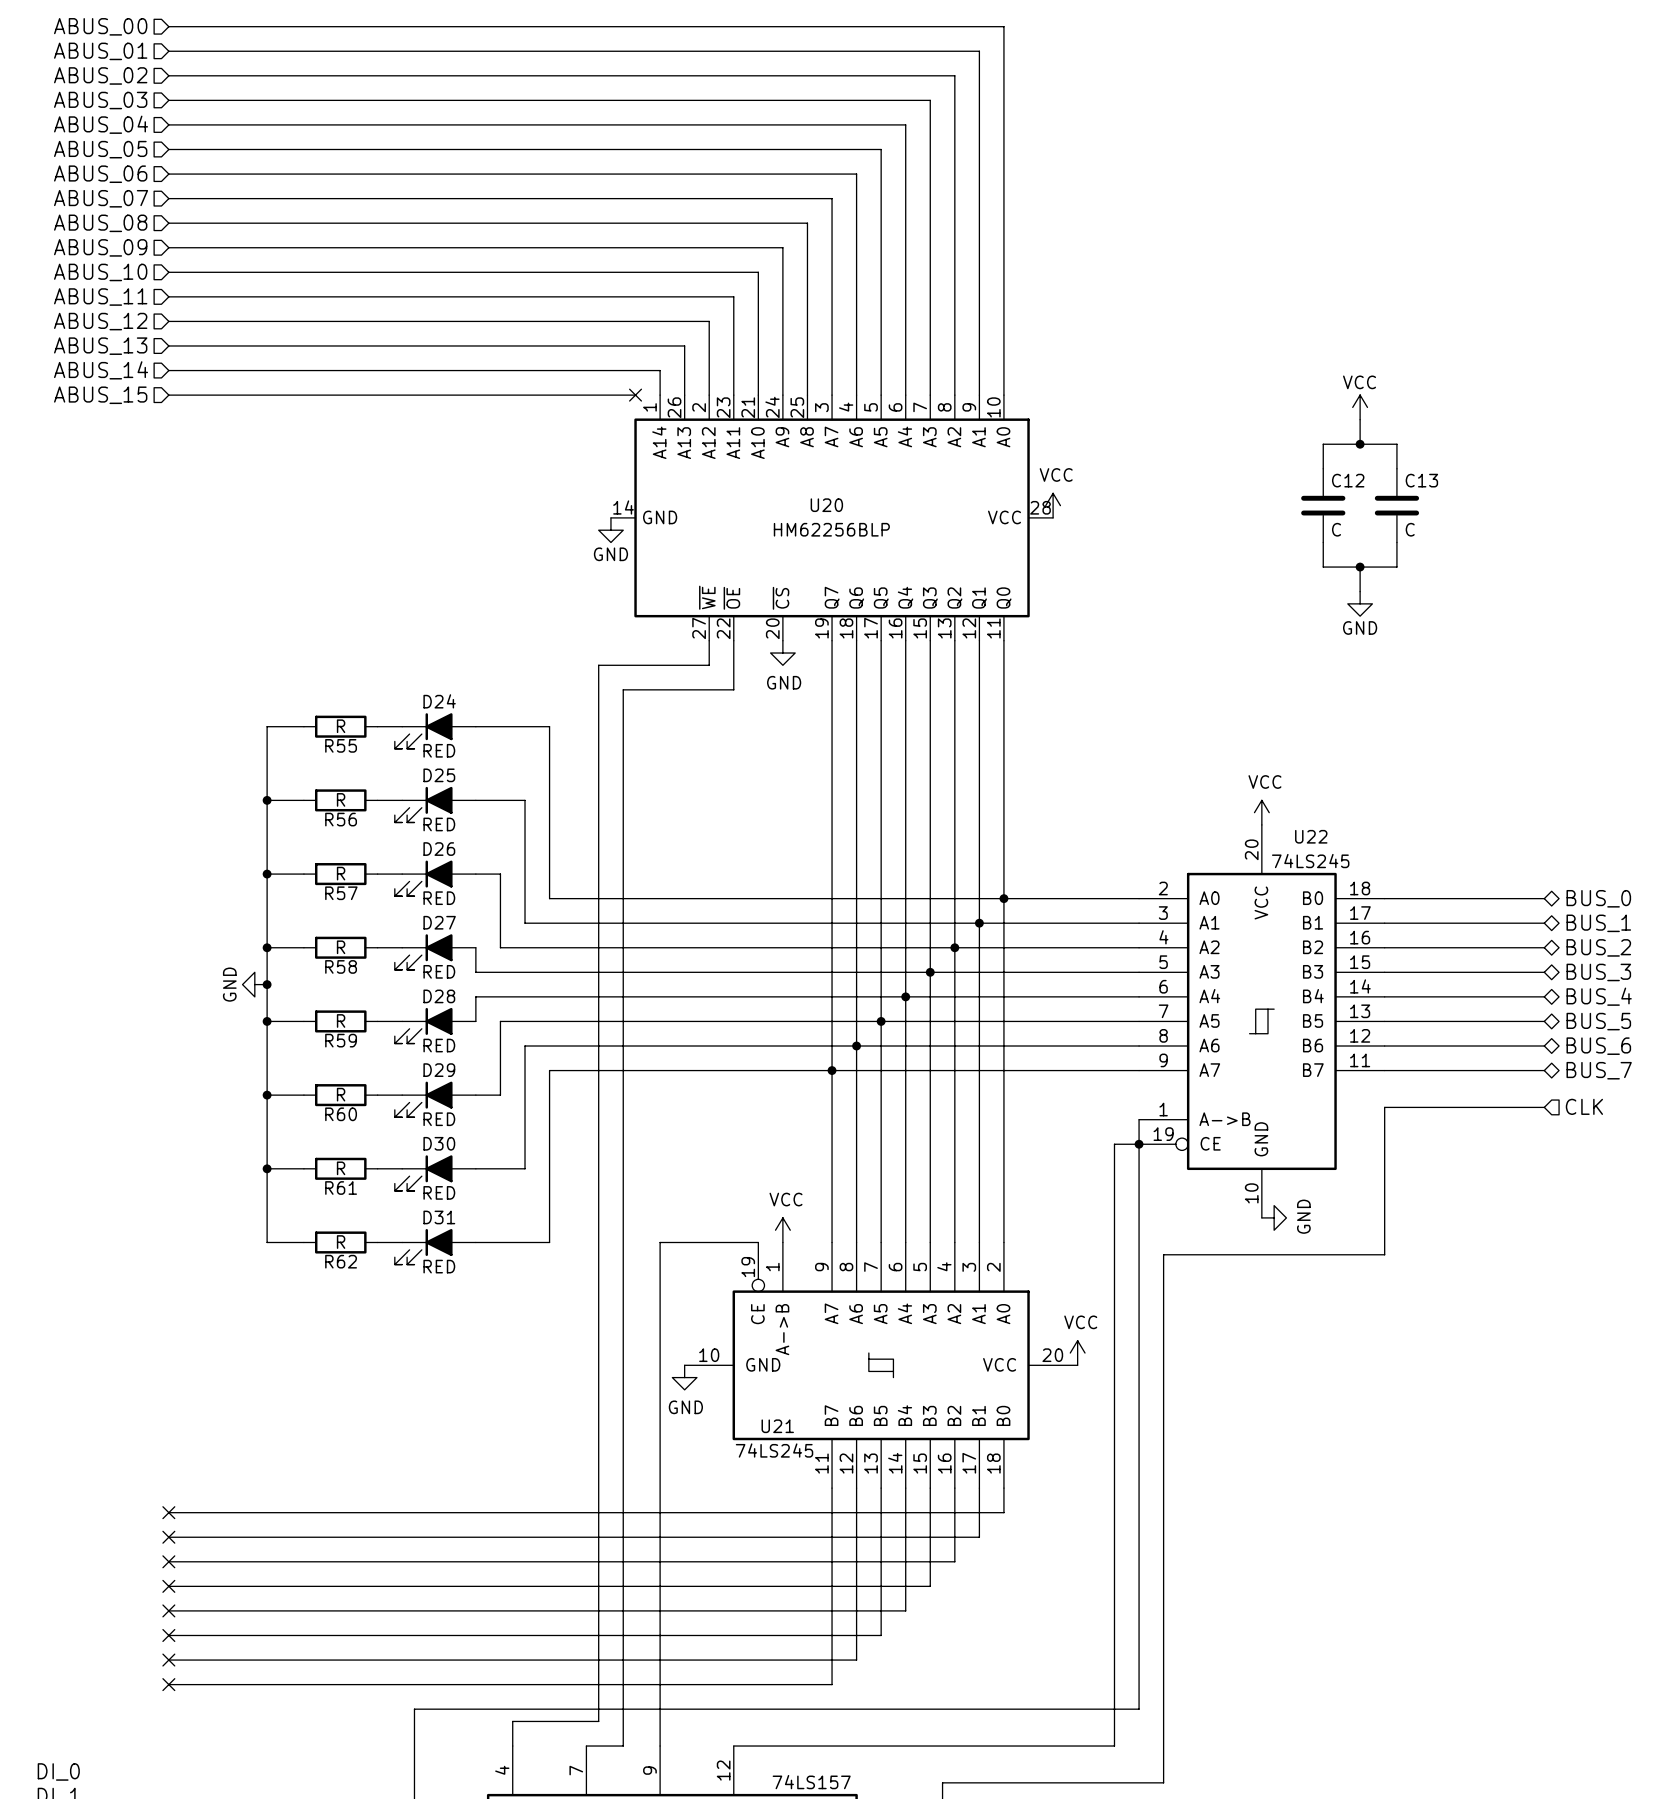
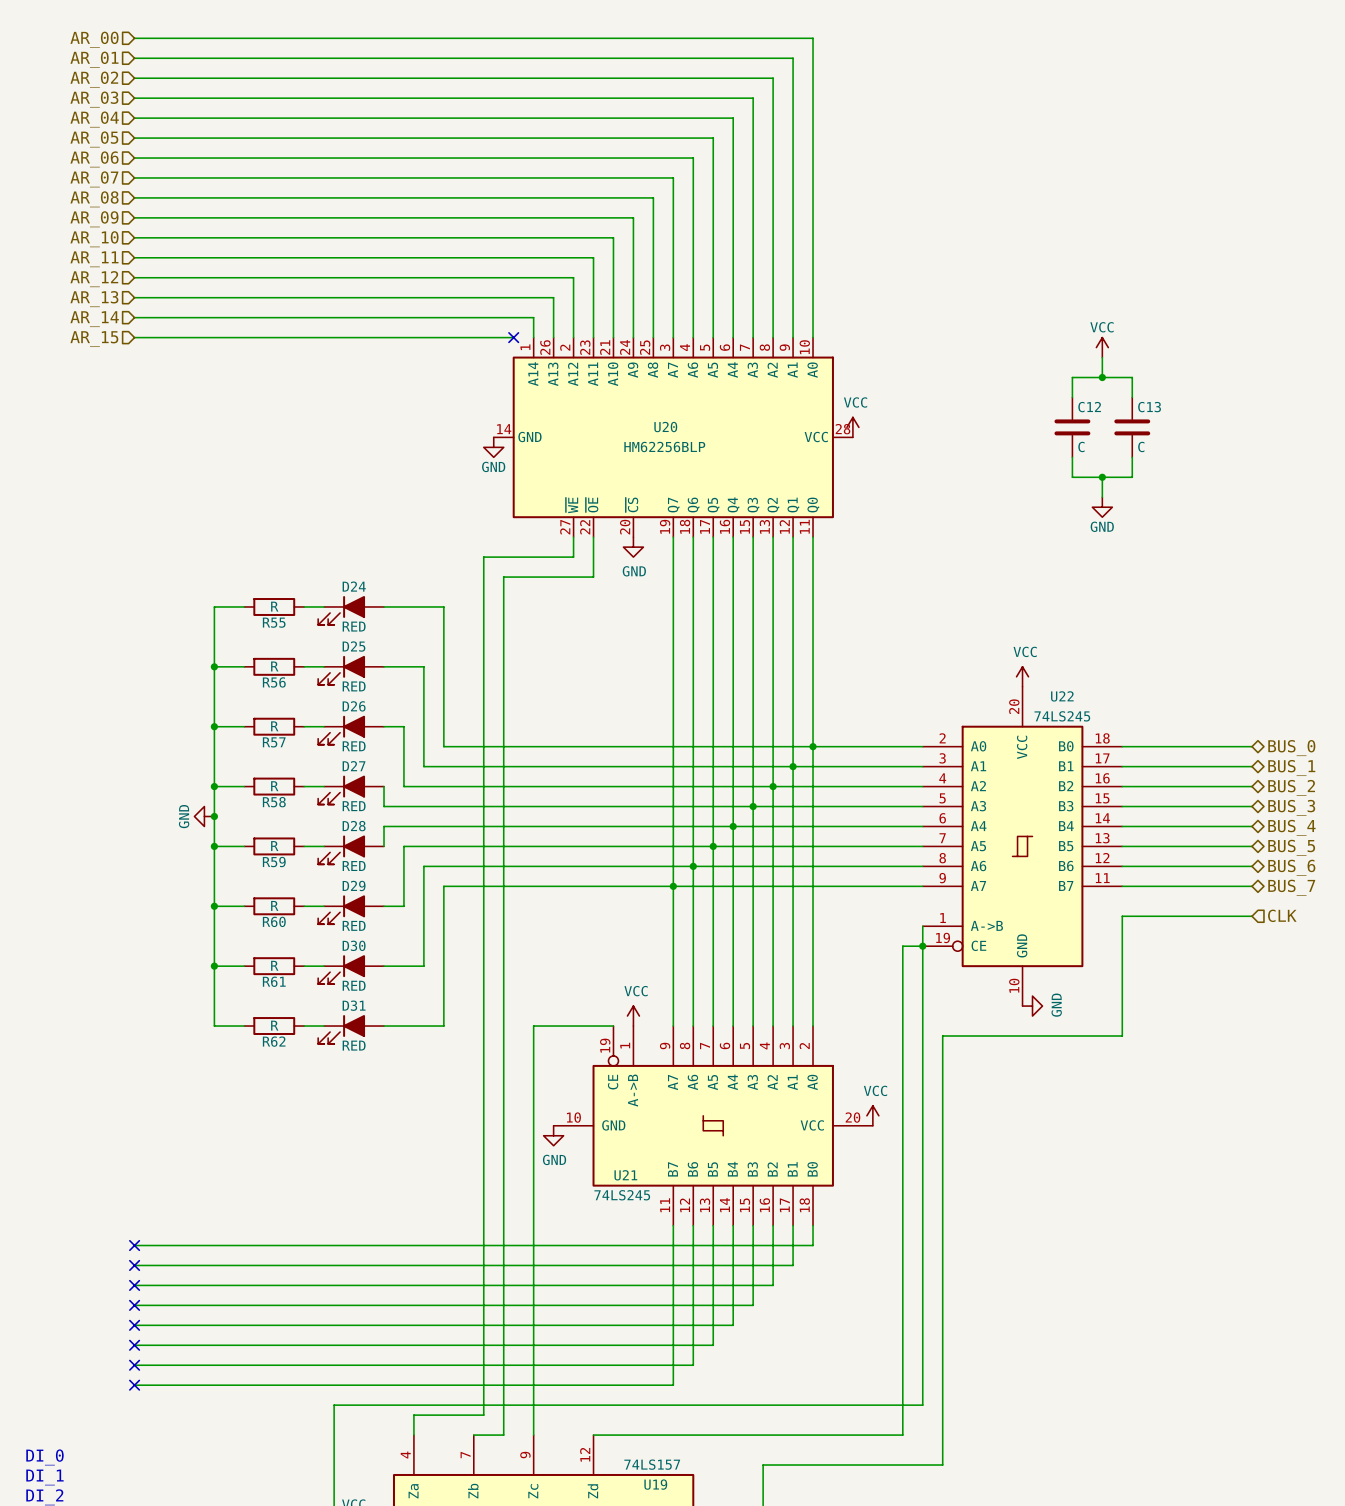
hierarchical label: ABUS_00 (100, 26) -> AR_00 (94, 39)
hierarchical label: ABUS_01 (100, 51) -> AR_01 (94, 59)
hierarchical label: ABUS_02 (100, 75) -> AR_02 (94, 79)
hierarchical label: ABUS_03 (100, 100) -> AR_03 (94, 99)
hierarchical label: ABUS_04 (101, 124) -> AR_04 (94, 119)
hierarchical label: ABUS_05 (100, 149) -> AR_05 (94, 139)
hierarchical label: ABUS_06 (100, 174) -> AR_06 (94, 159)
hierarchical label: ABUS_07 (101, 198) -> AR_07 (94, 179)
hierarchical label: ABUS_08 (100, 223) -> AR_08 (94, 199)
hierarchical label: ABUS_09 (100, 247) -> AR_09 (94, 219)
hierarchical label: ABUS_10 (100, 272) -> AR_10 (94, 239)
hierarchical label: ABUS_11 (100, 297) -> AR_11 (94, 259)
hierarchical label: ABUS_12 (100, 321) -> AR_12 (94, 279)
hierarchical label: ABUS_13 (100, 346) -> AR_13 (94, 299)
hierarchical label: ABUS_14 (101, 370) -> AR_14 (94, 319)
hierarchical label: ABUS_15 (100, 395) -> AR_15 (94, 339)

